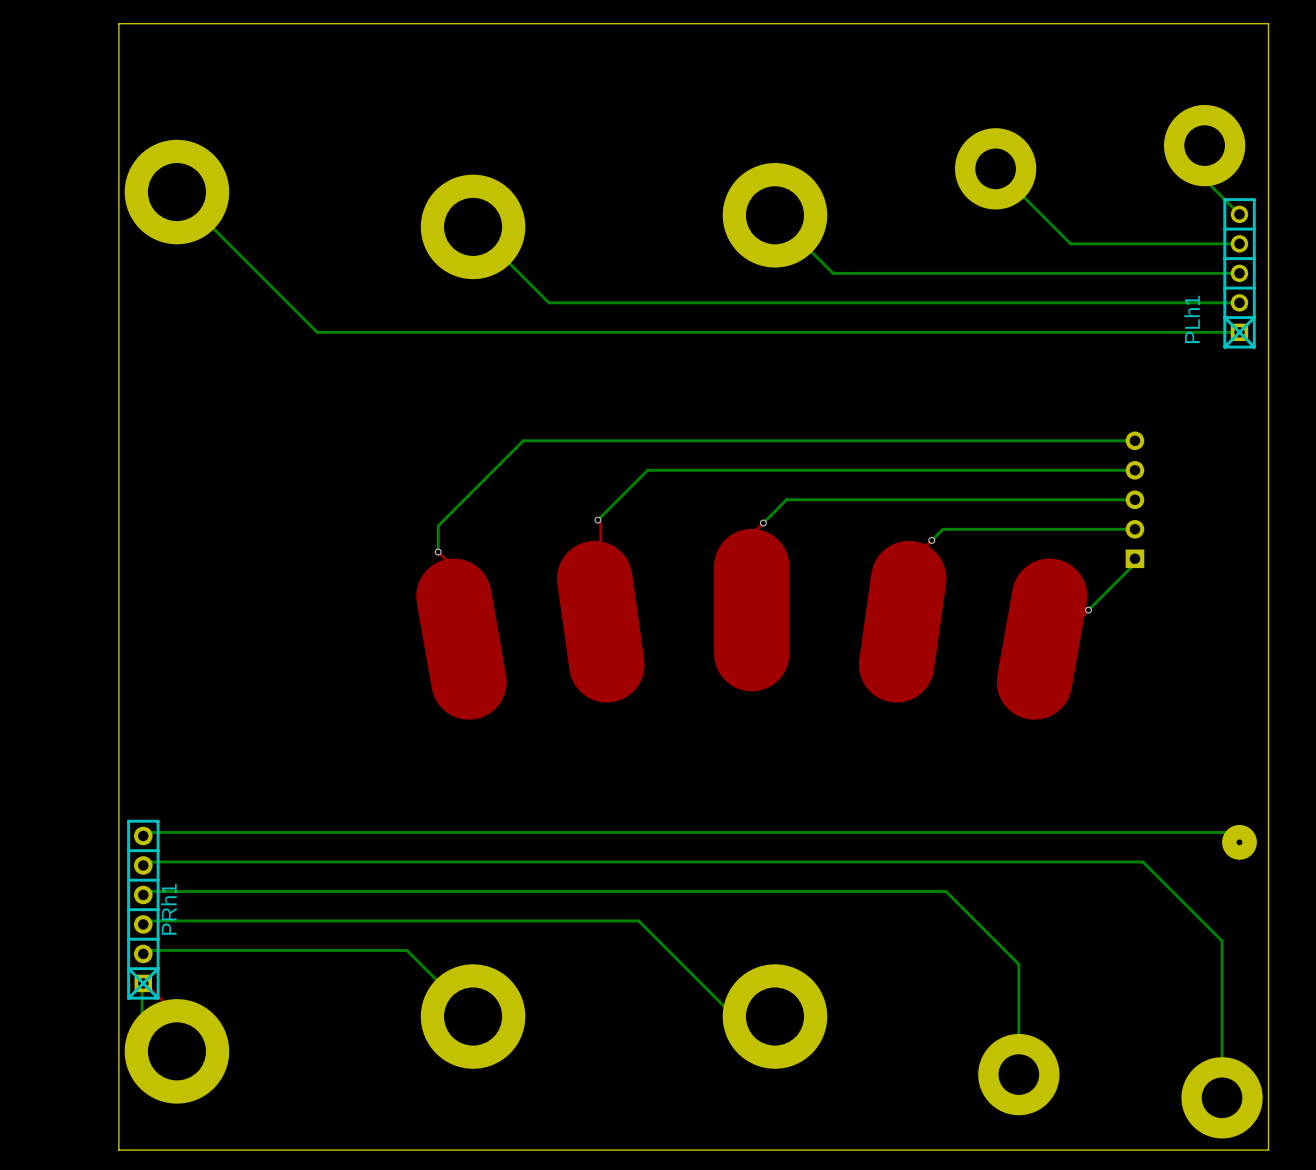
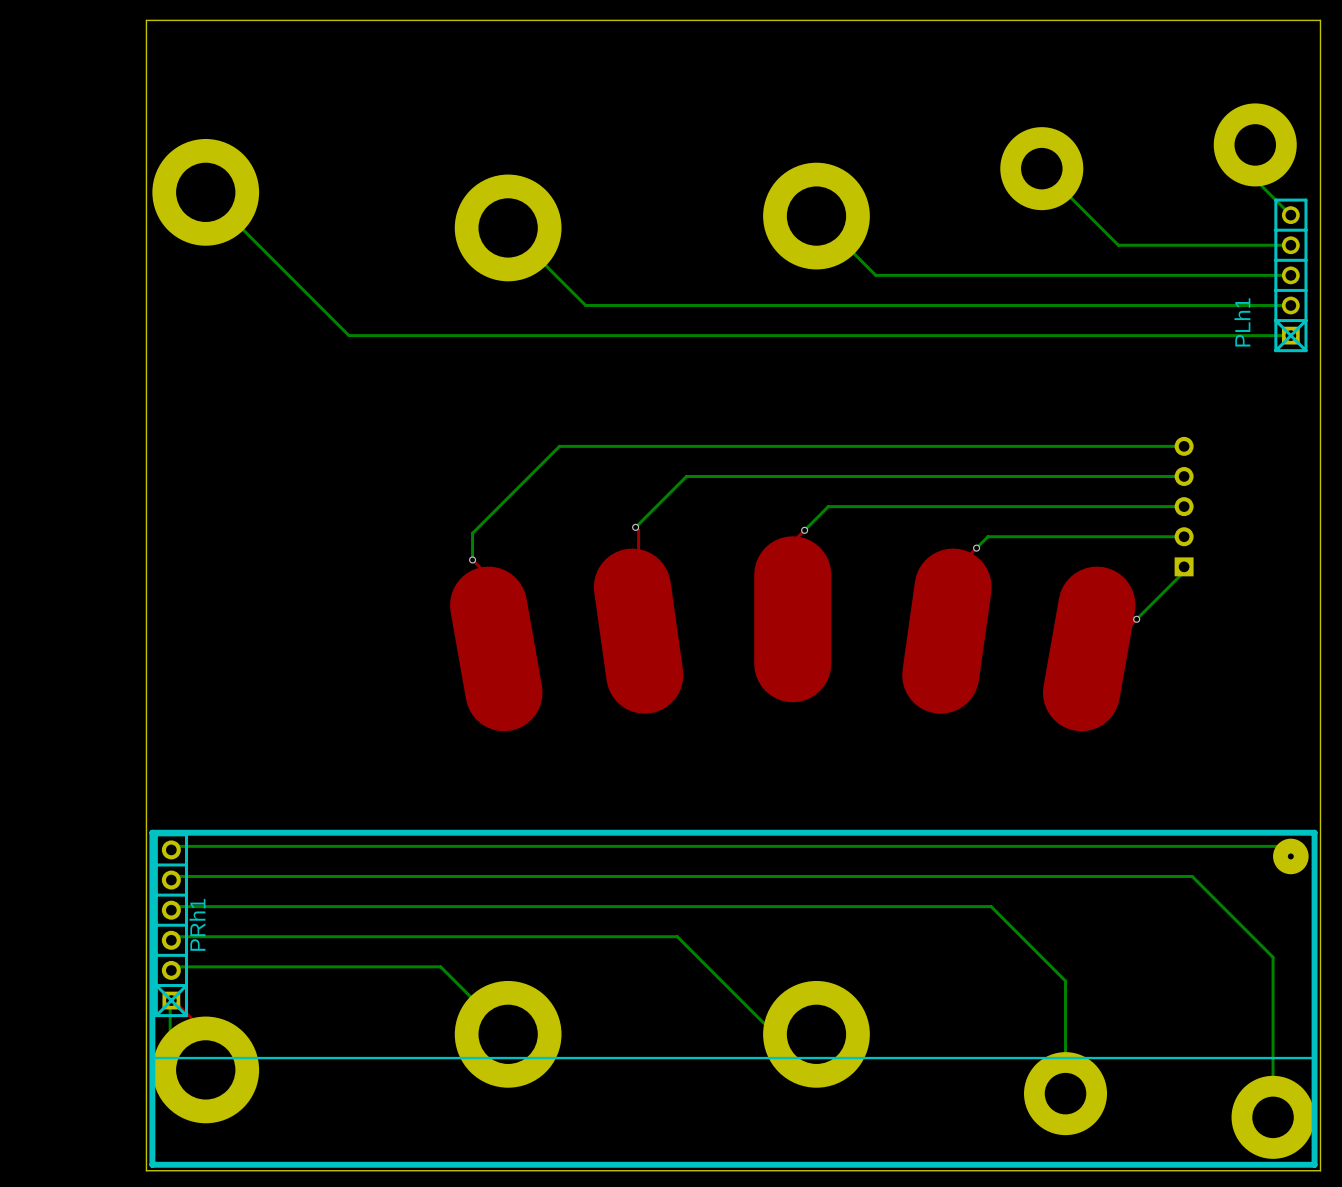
line: none -> (152, 832) (152, 1164) (1314, 1164) (1314, 832) (152, 832)
line: none -> (152, 1058) (1314, 1058)

